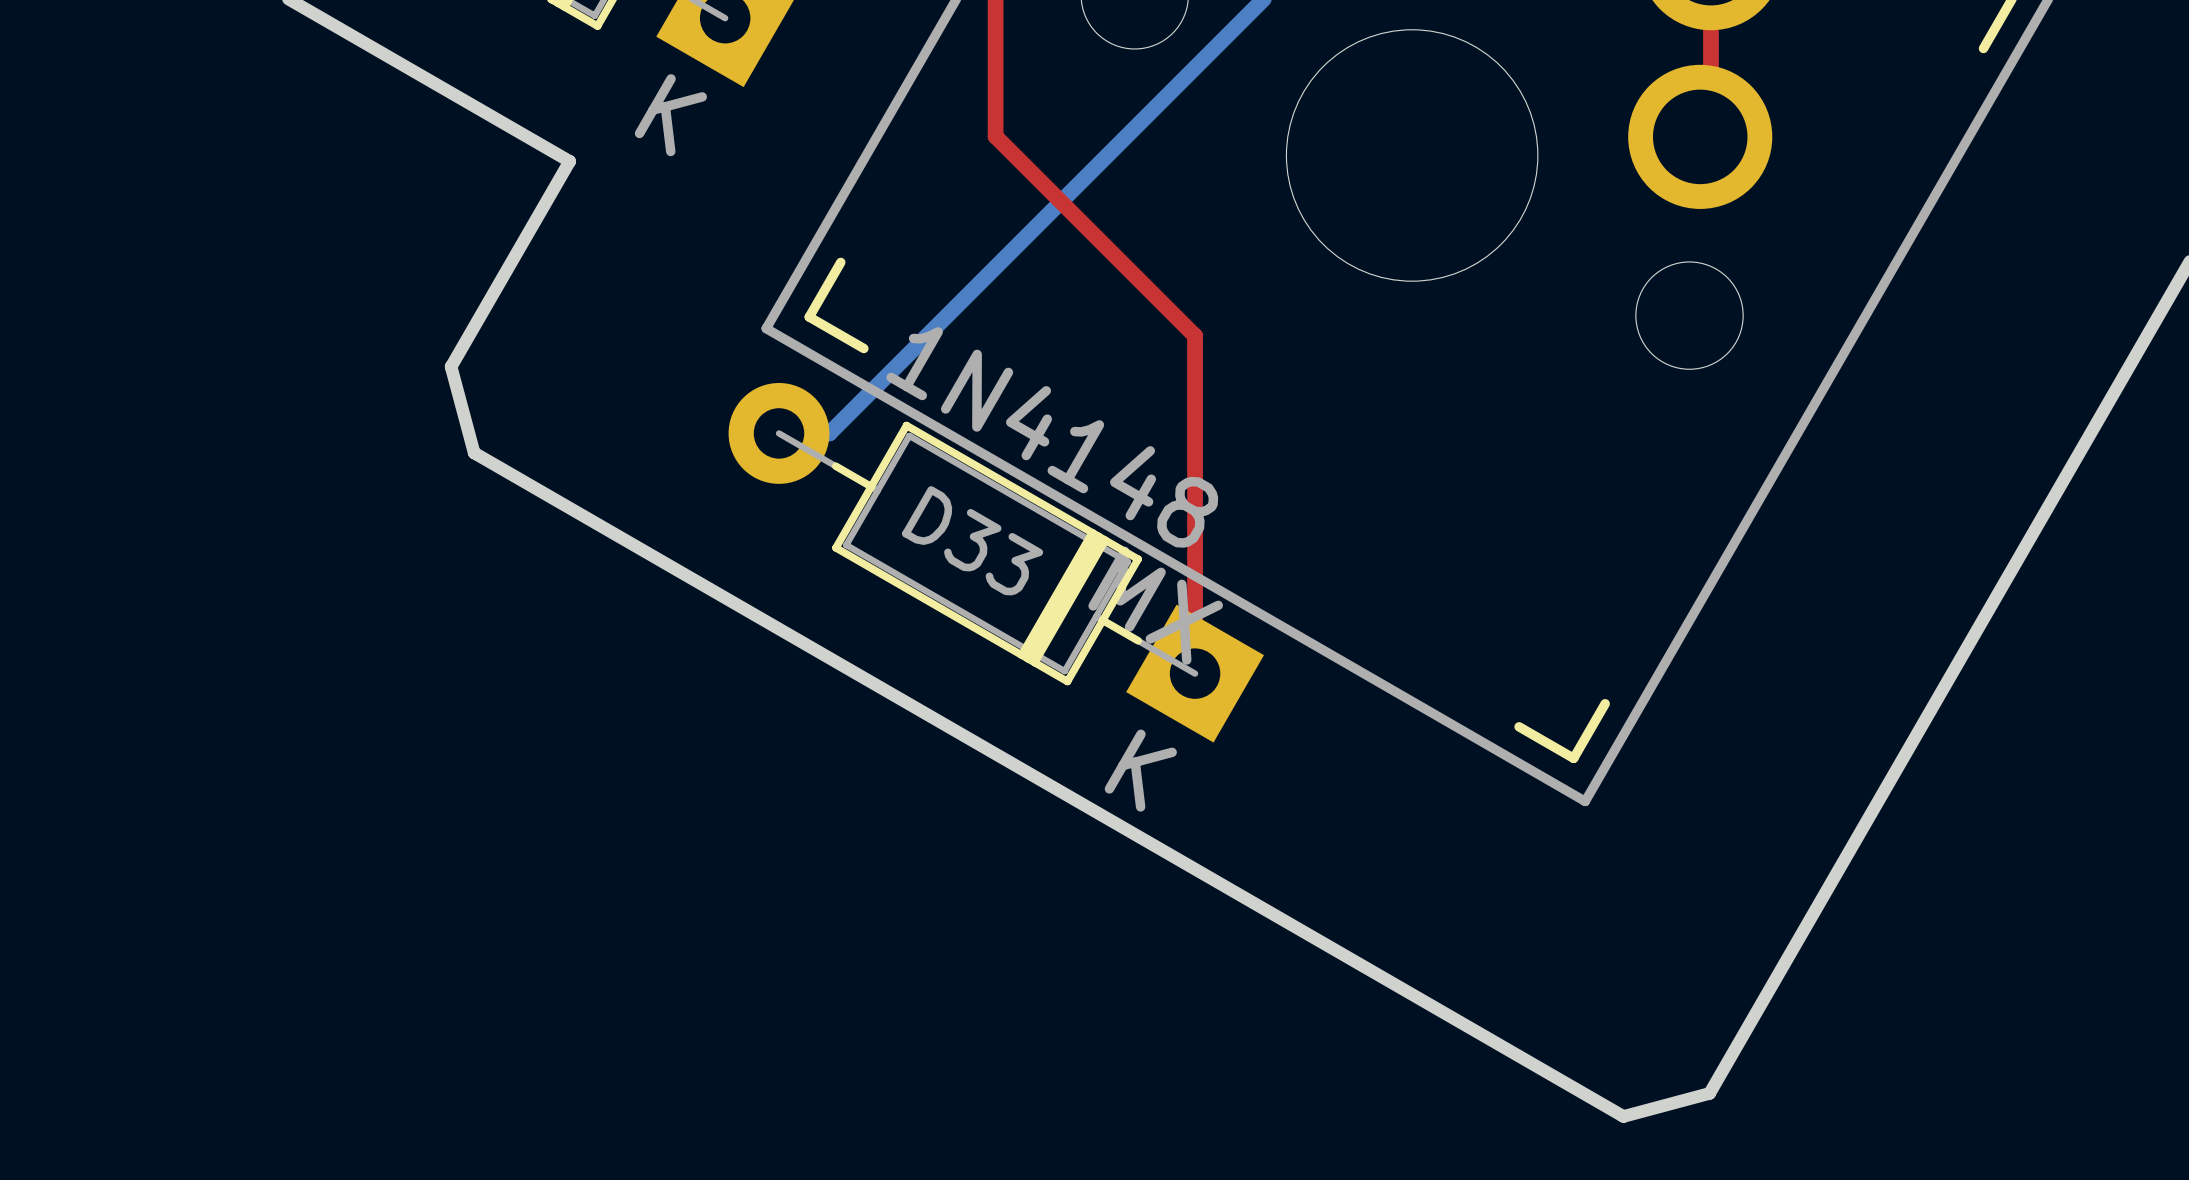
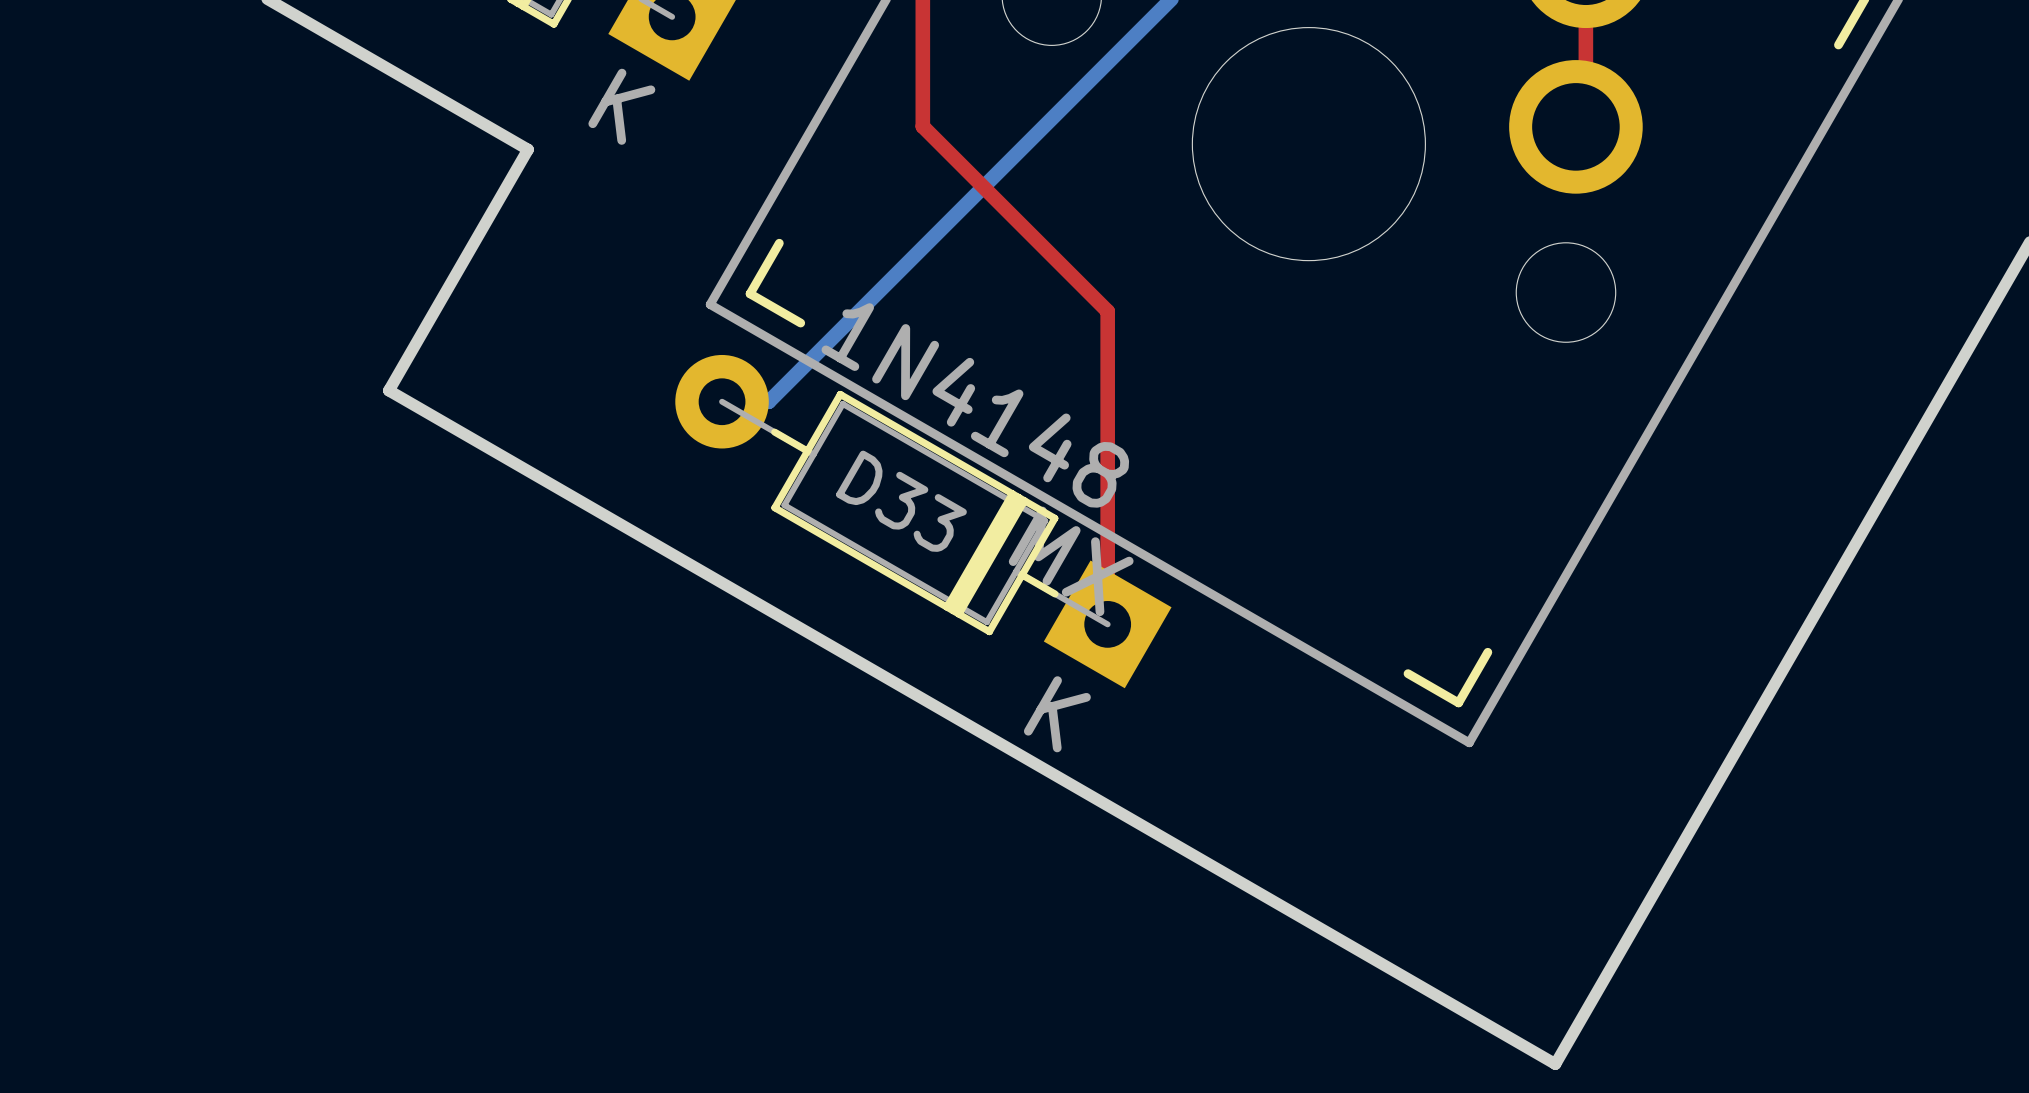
board edge: (451, 366) (474, 452) -> (418, 339) (388, 390) (439, 419)
board edge: (1709, 1093) (1623, 1116) -> (1584, 1013) (1555, 1064) (1504, 1034)

